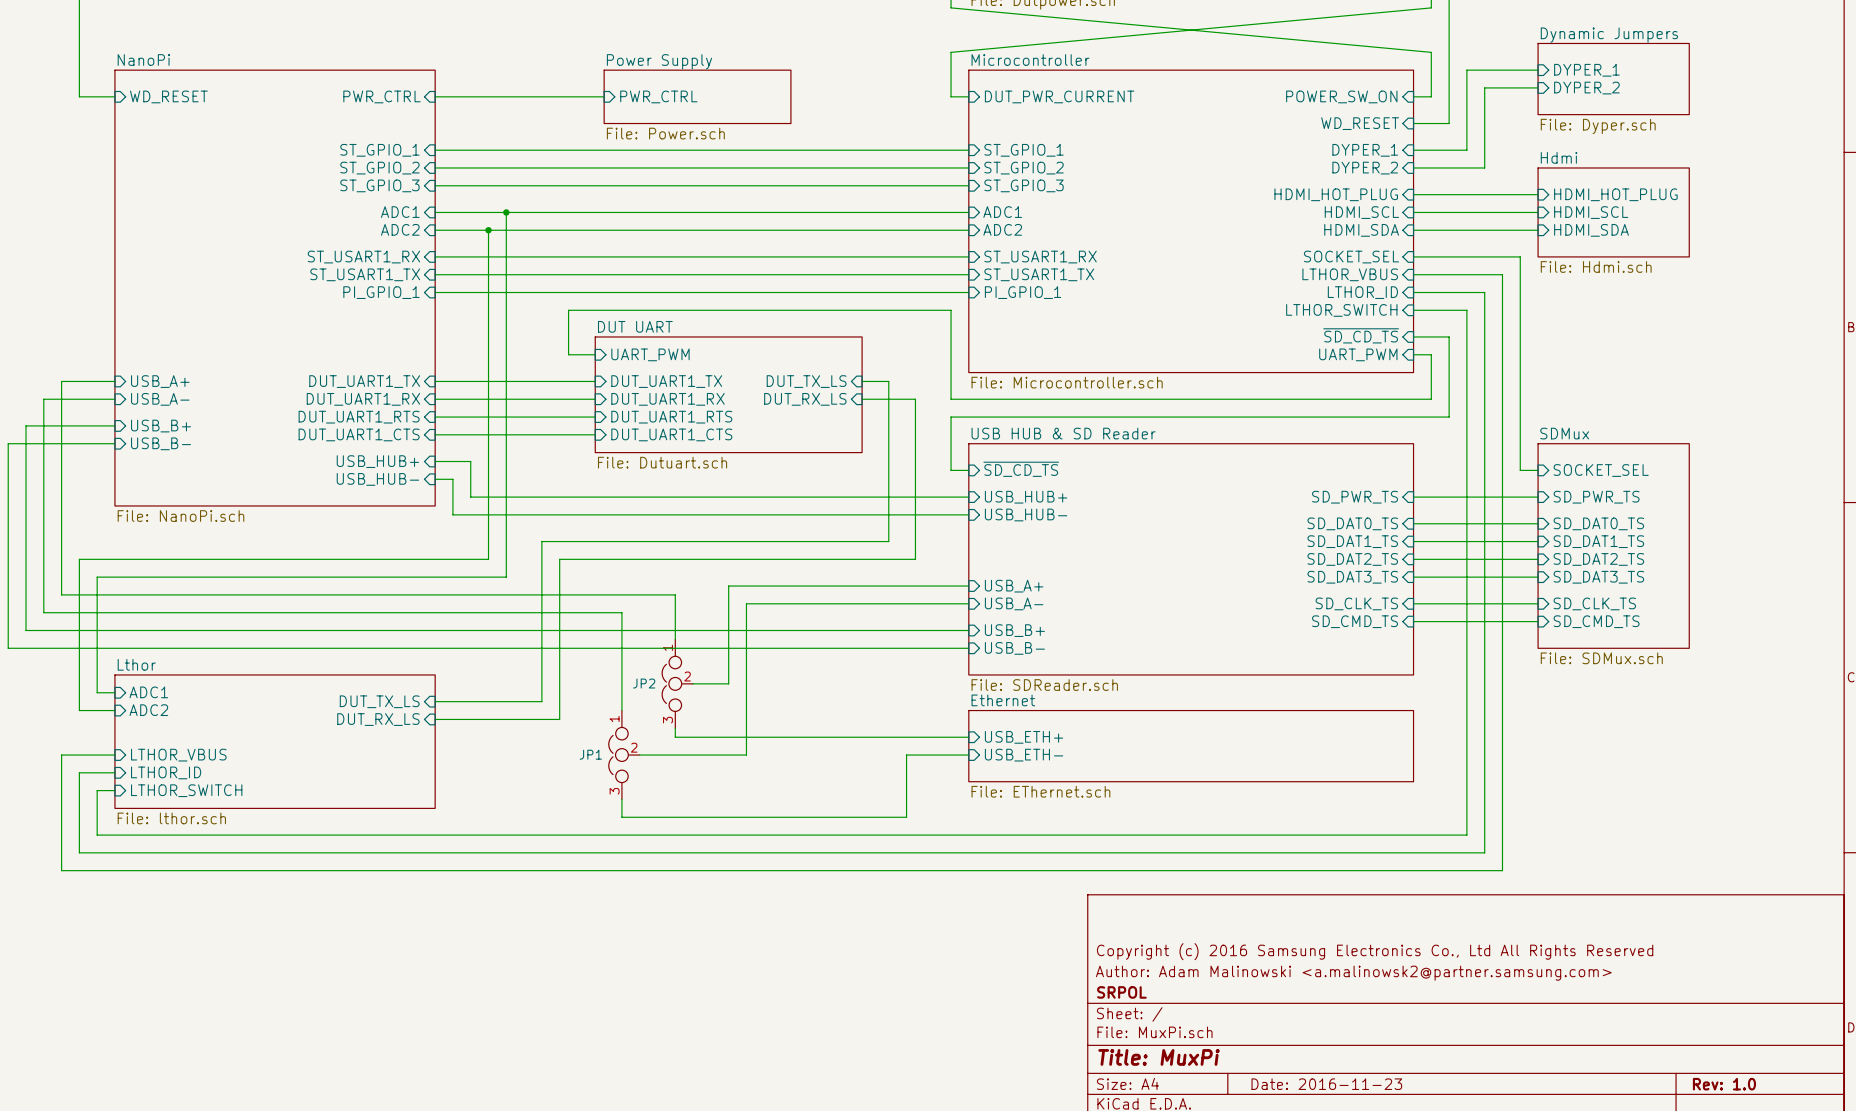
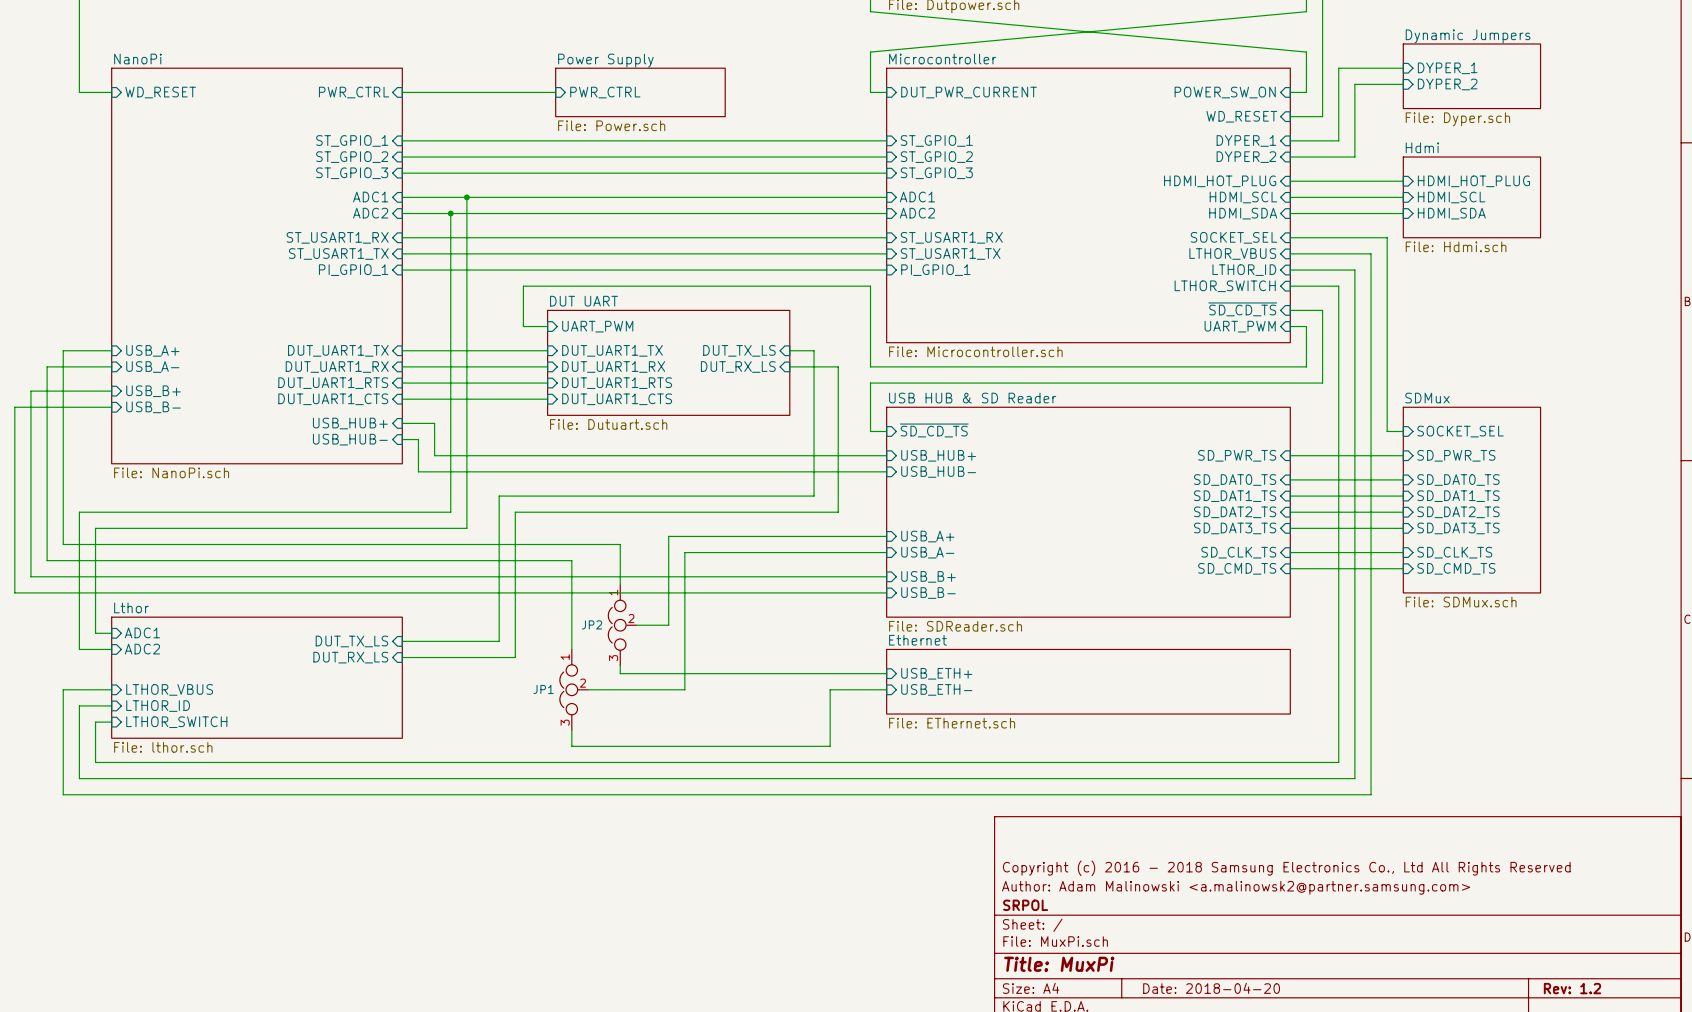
title block: Copyright (c) 2016 Samsung Electronics Co., Ltd All Rights Reserved (1375, 951) -> Copyright (c) 2016 - 2018 Samsung Electronics Co., Ltd All Rights Reserved (1286, 868)
title block: Date: 2016-11-23 (1326, 1084) -> Date: 2018-04-20 (1211, 988)
title block: Rev: 1.0 (1724, 1084) -> Rev: 1.2 (1572, 988)

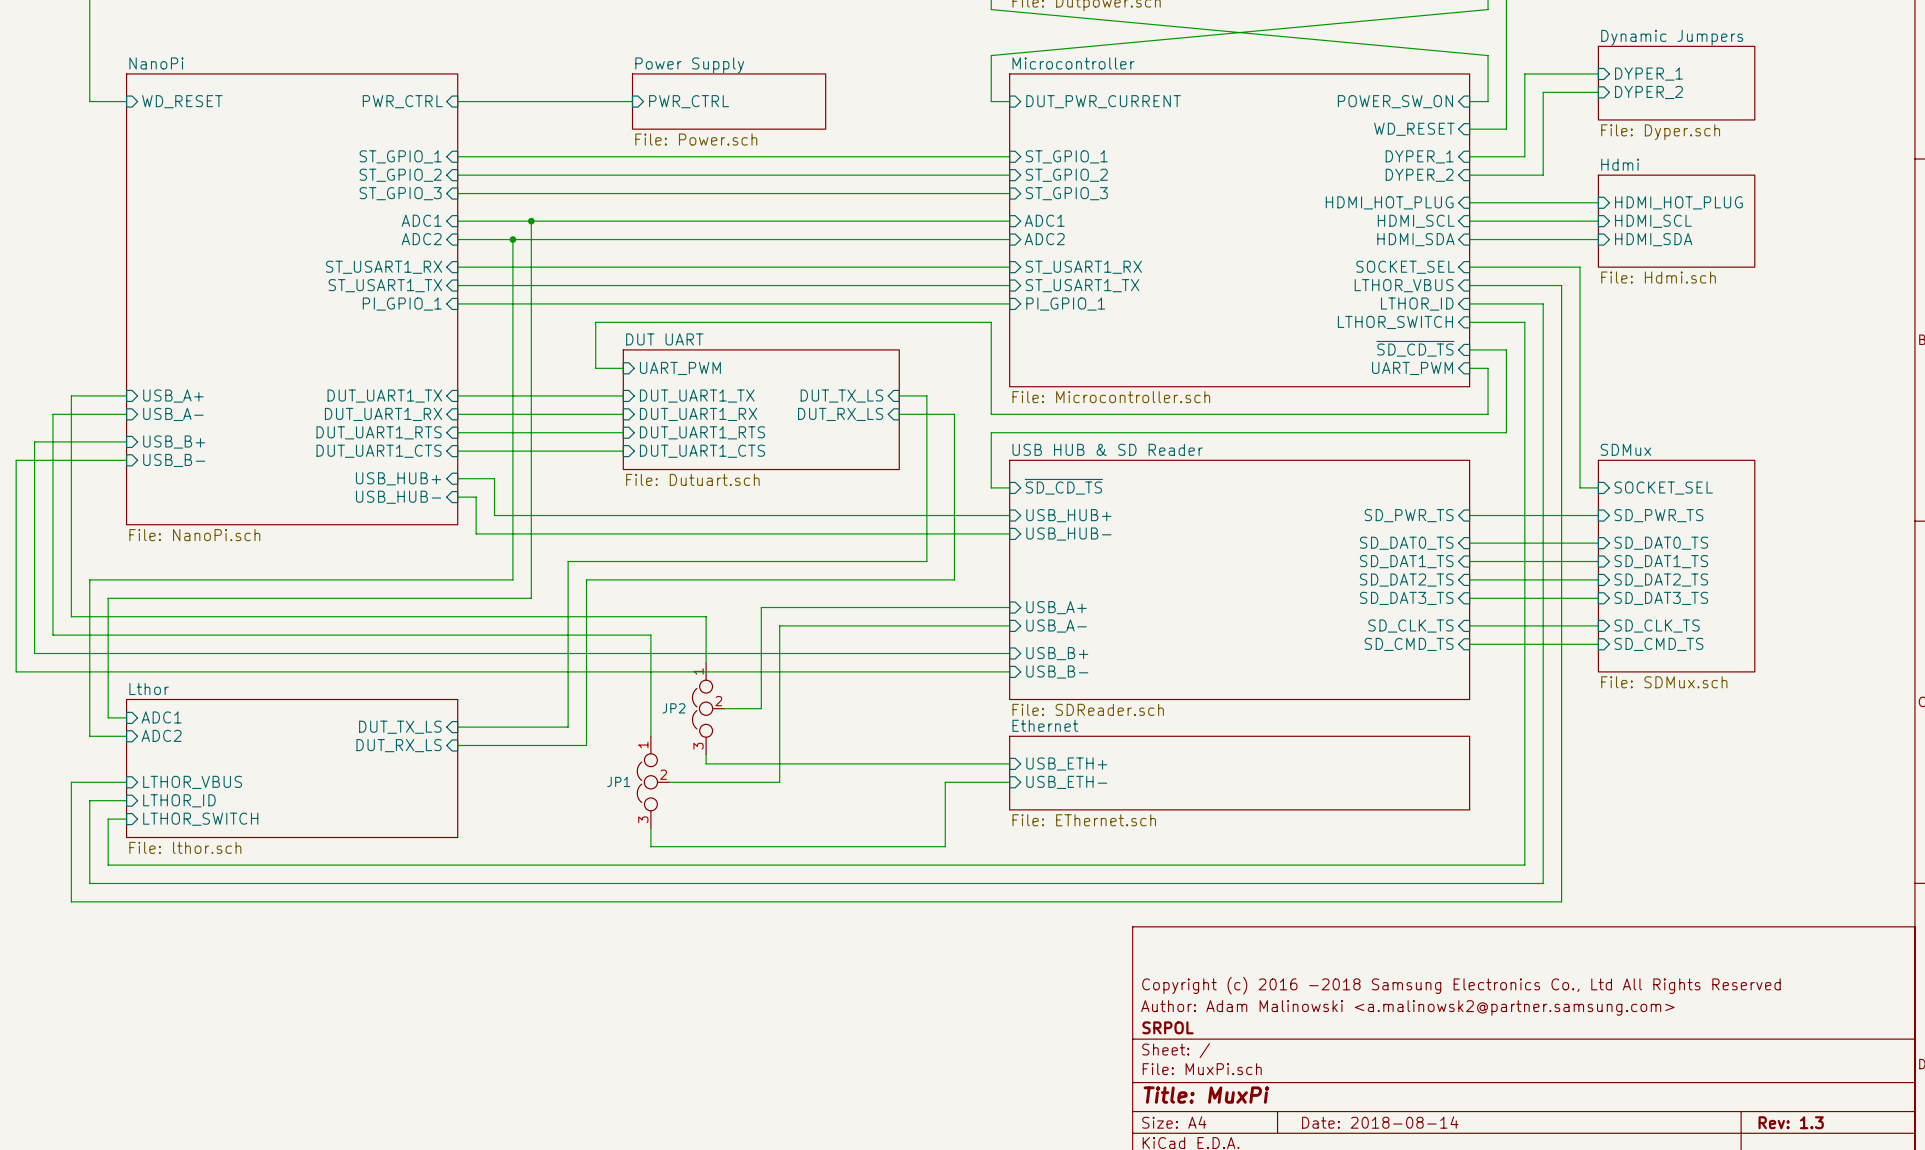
title block: Copyright (c) 2016 - 2018 Samsung Electronics Co., Ltd All Rights Reserved (1286, 868) -> Copyright (c) 2016 -2018 Samsung Electronics Co., Ltd All Rights Reserved (1461, 985)
title block: Date: 2018-04-20 (1211, 988) -> Date: 2018-08-14 (1380, 1122)
title block: Rev: 1.2 (1572, 988) -> Rev: 1.3 (1791, 1122)

